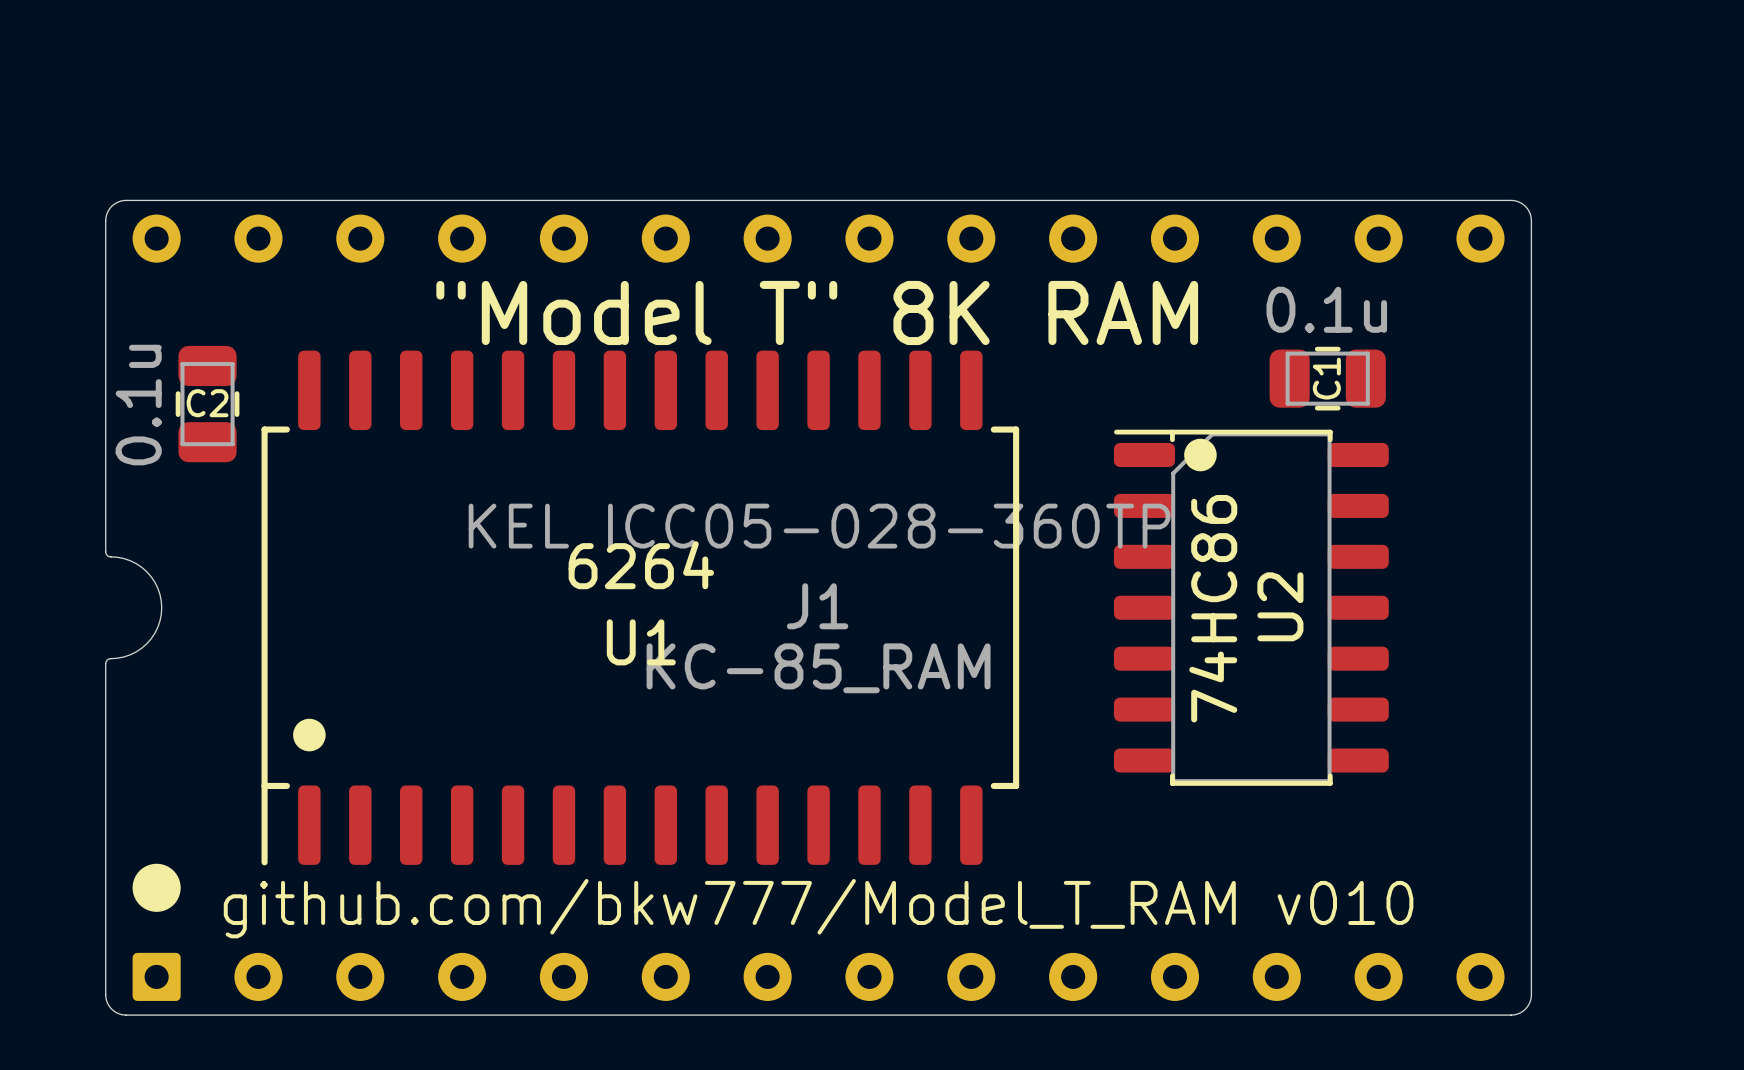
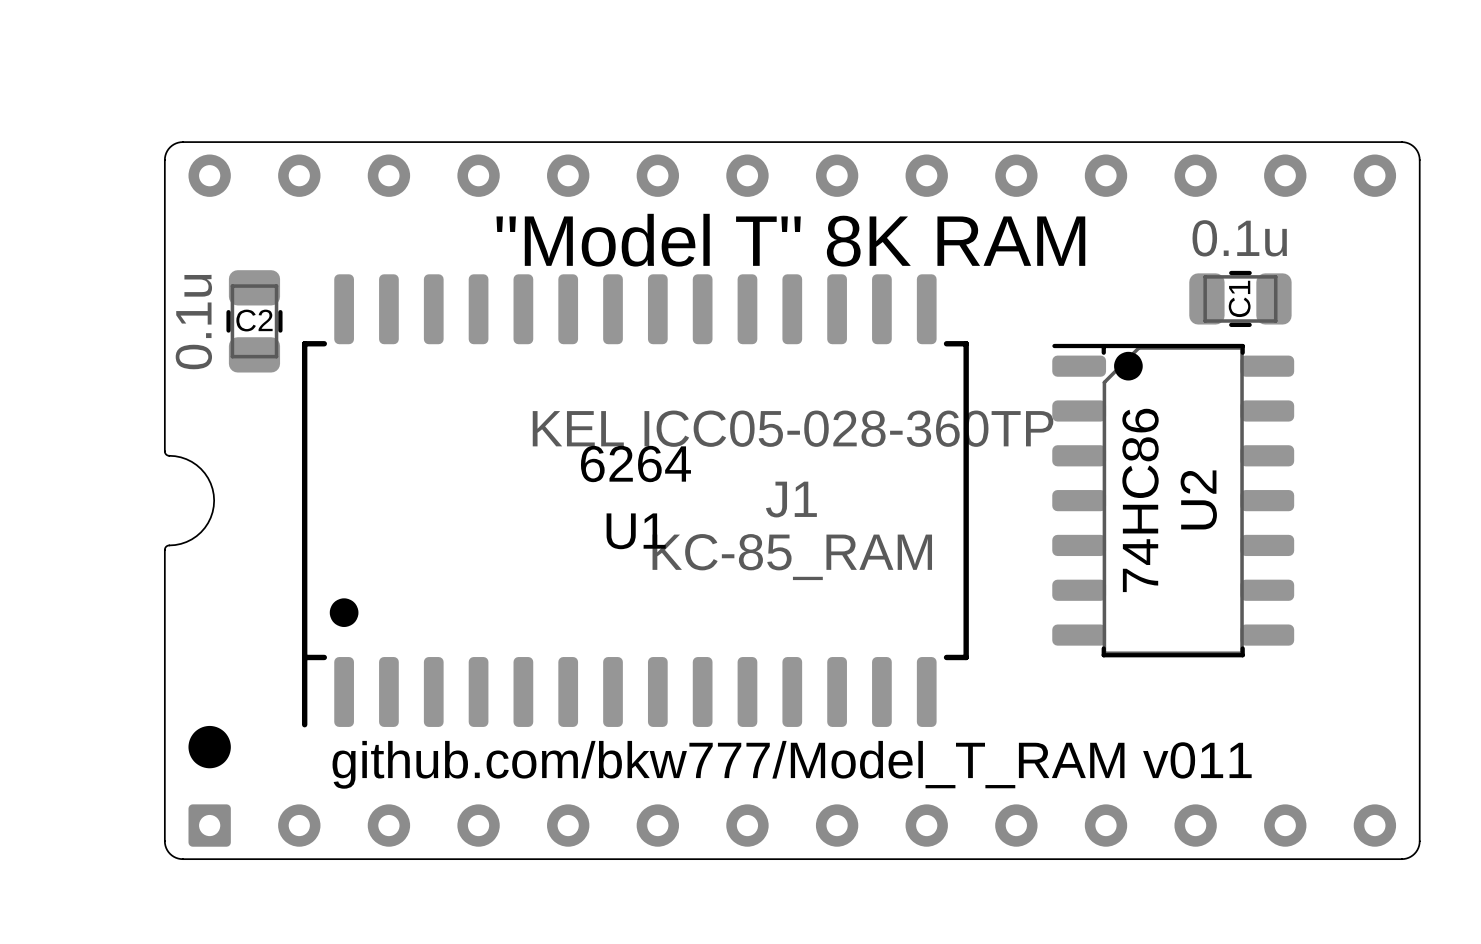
text: github.com/bkw777/Model_T_RAM v010 (818, 908) -> github.com/bkw777/Model_T_RAM v011 (792, 764)

